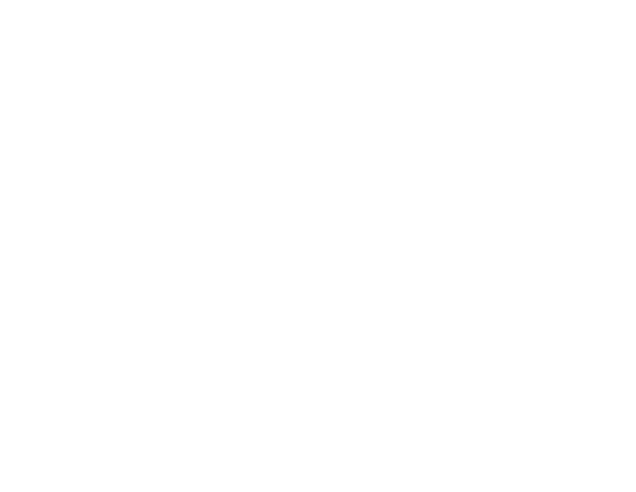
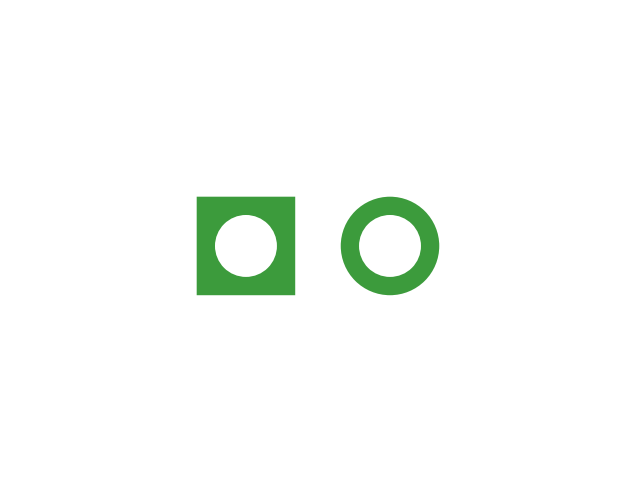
part: none -> (317, 245)

